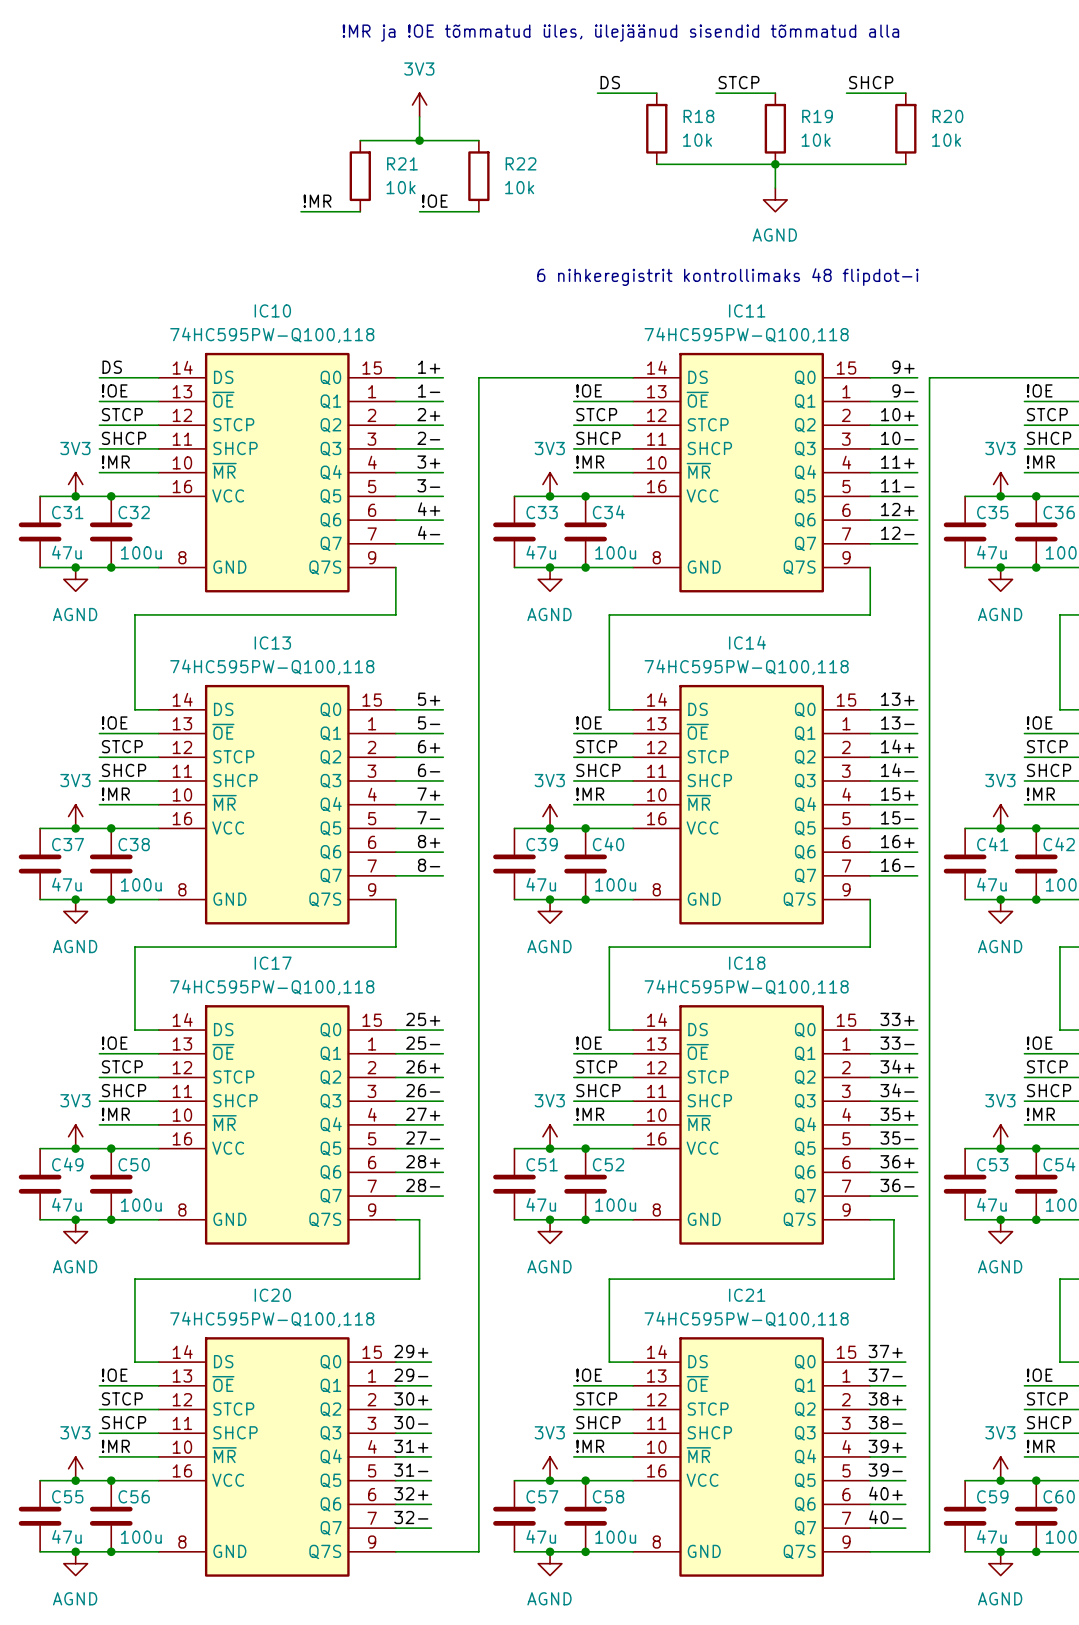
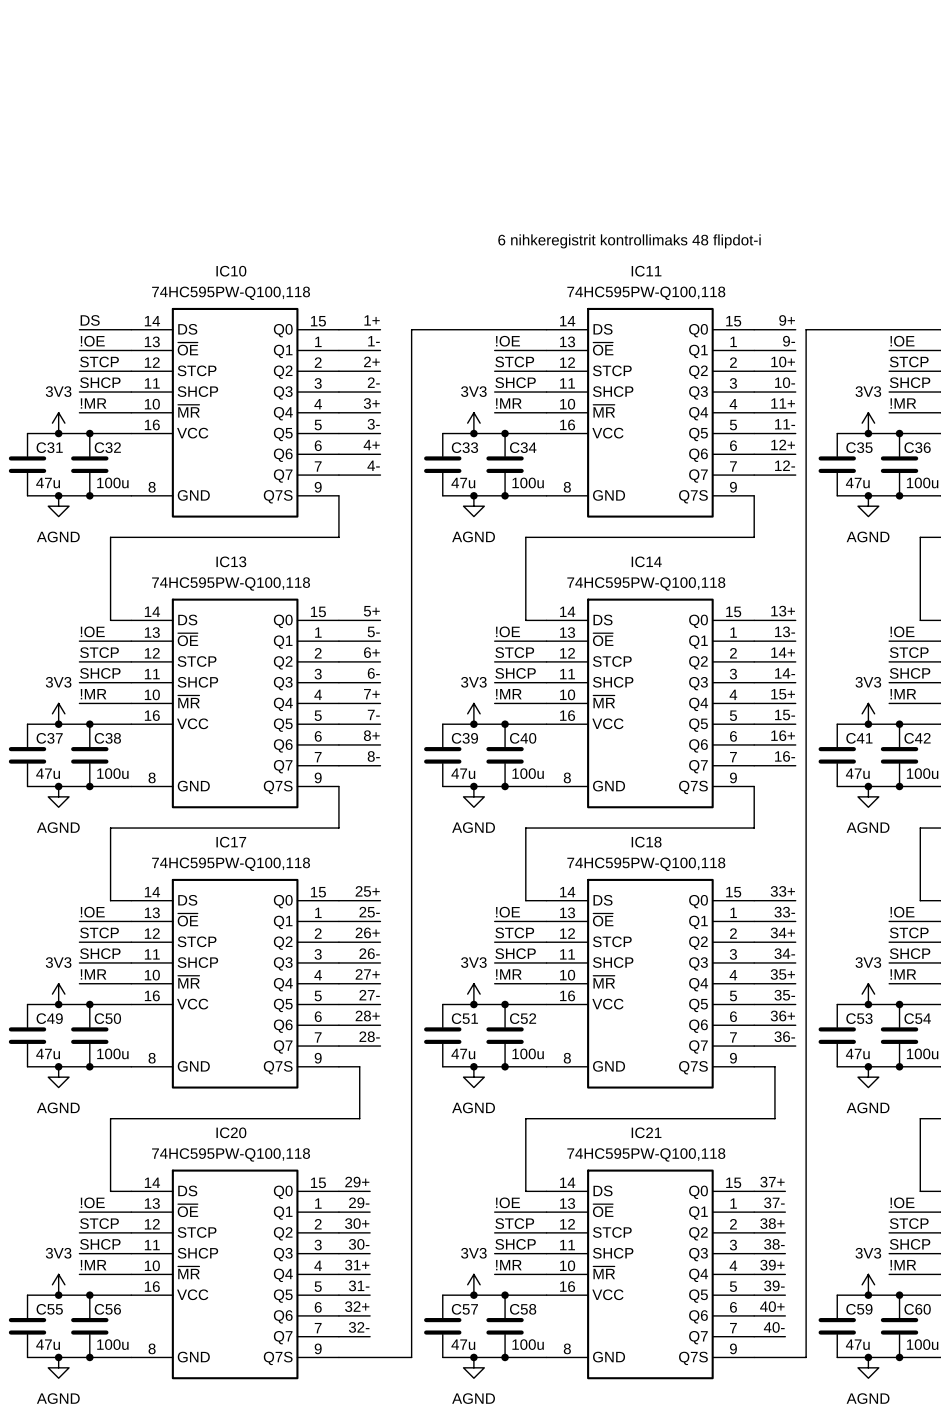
text: !MR ja !OE tõmmatud üles, ülejäänud sisendid tõmmatud alla (620, 33) -> none
label: DS (610, 82) -> none
label: STCP (739, 82) -> none
label: SHCP (871, 82) -> none
wire: (597, 93) (656, 93) -> none
wire: (716, 93) (775, 93) -> none
wire: (846, 93) (905, 93) -> none
power symbol: 3V3 (419, 105) -> none
wire: (419, 116) (419, 140) -> none
R18: 10k (656, 128) -> none
R19: 10k (775, 128) -> none
R20: 10k (905, 128) -> none
wire: (360, 140) (478, 140) -> none
junction: (419, 140) -> none
wire: (656, 164) (905, 164) -> none
wire: (775, 164) (775, 188) -> none
junction: (775, 164) -> none
R21: 10k (360, 176) -> none
R22: 10k (478, 176) -> none
power symbol: AGND (775, 199) -> none
label: !MR (317, 201) -> none
label: !OE (434, 201) -> none
wire: (301, 211) (360, 211) -> none
wire: (419, 211) (478, 211) -> none

